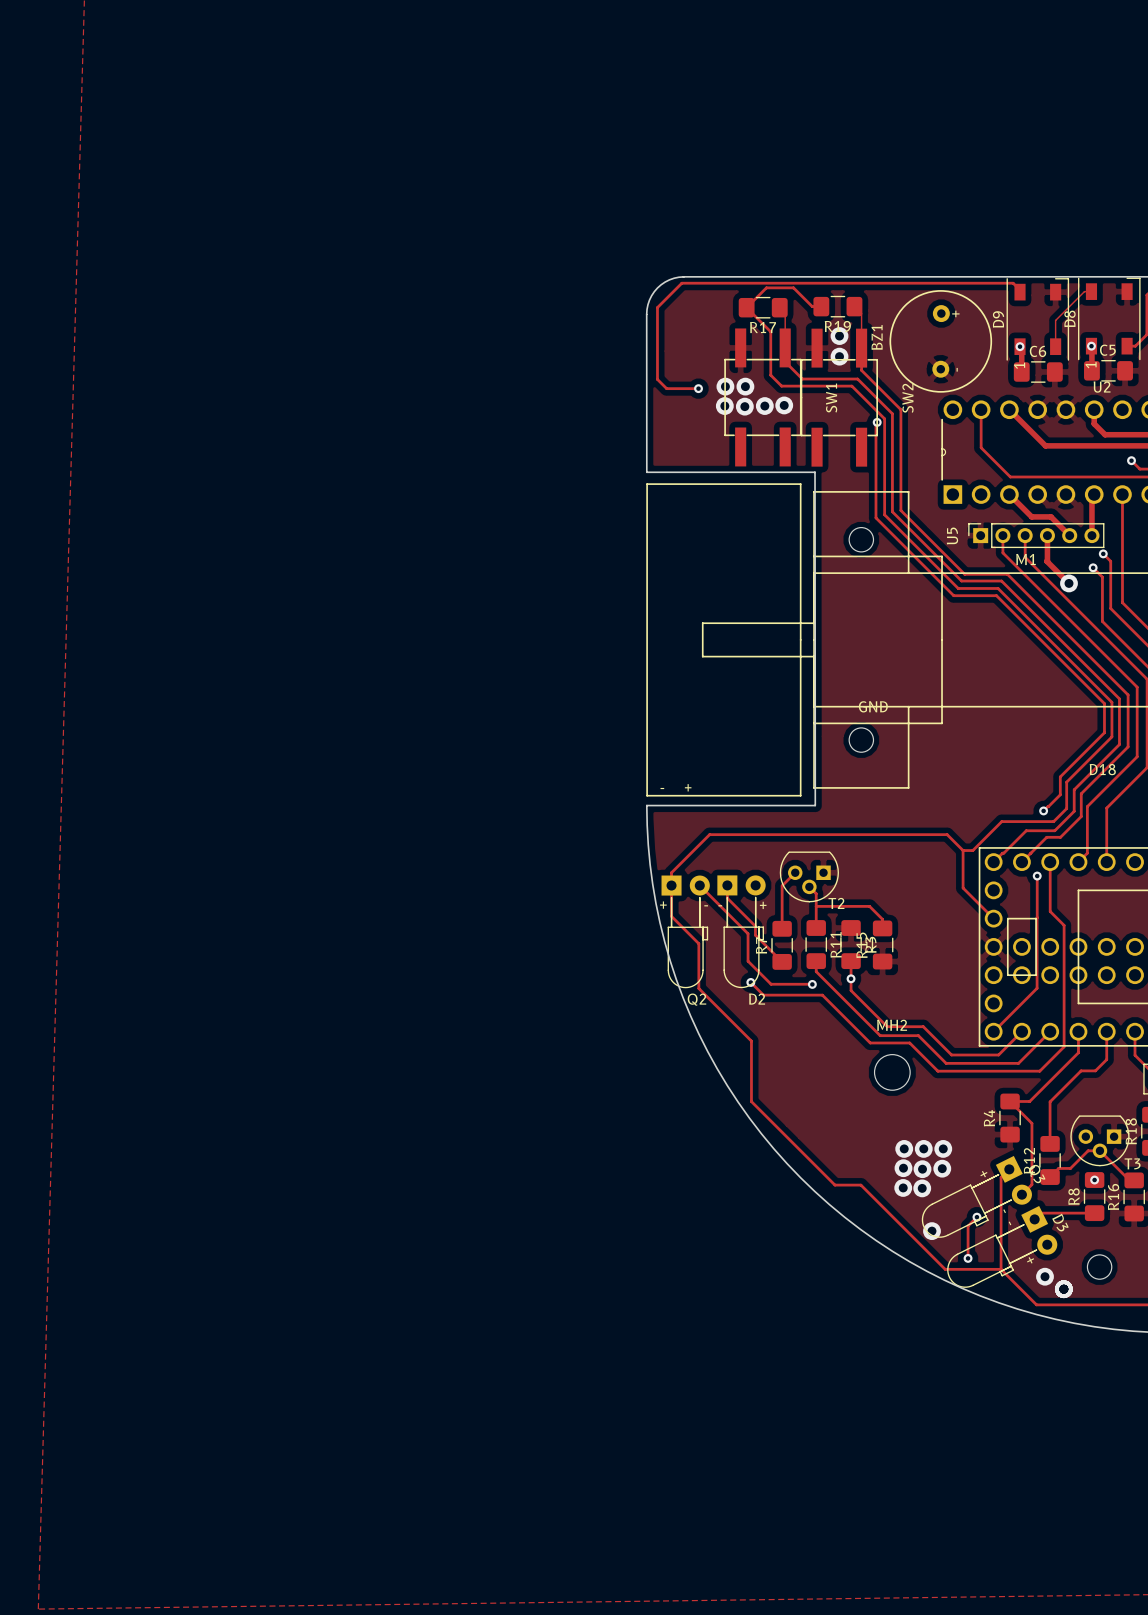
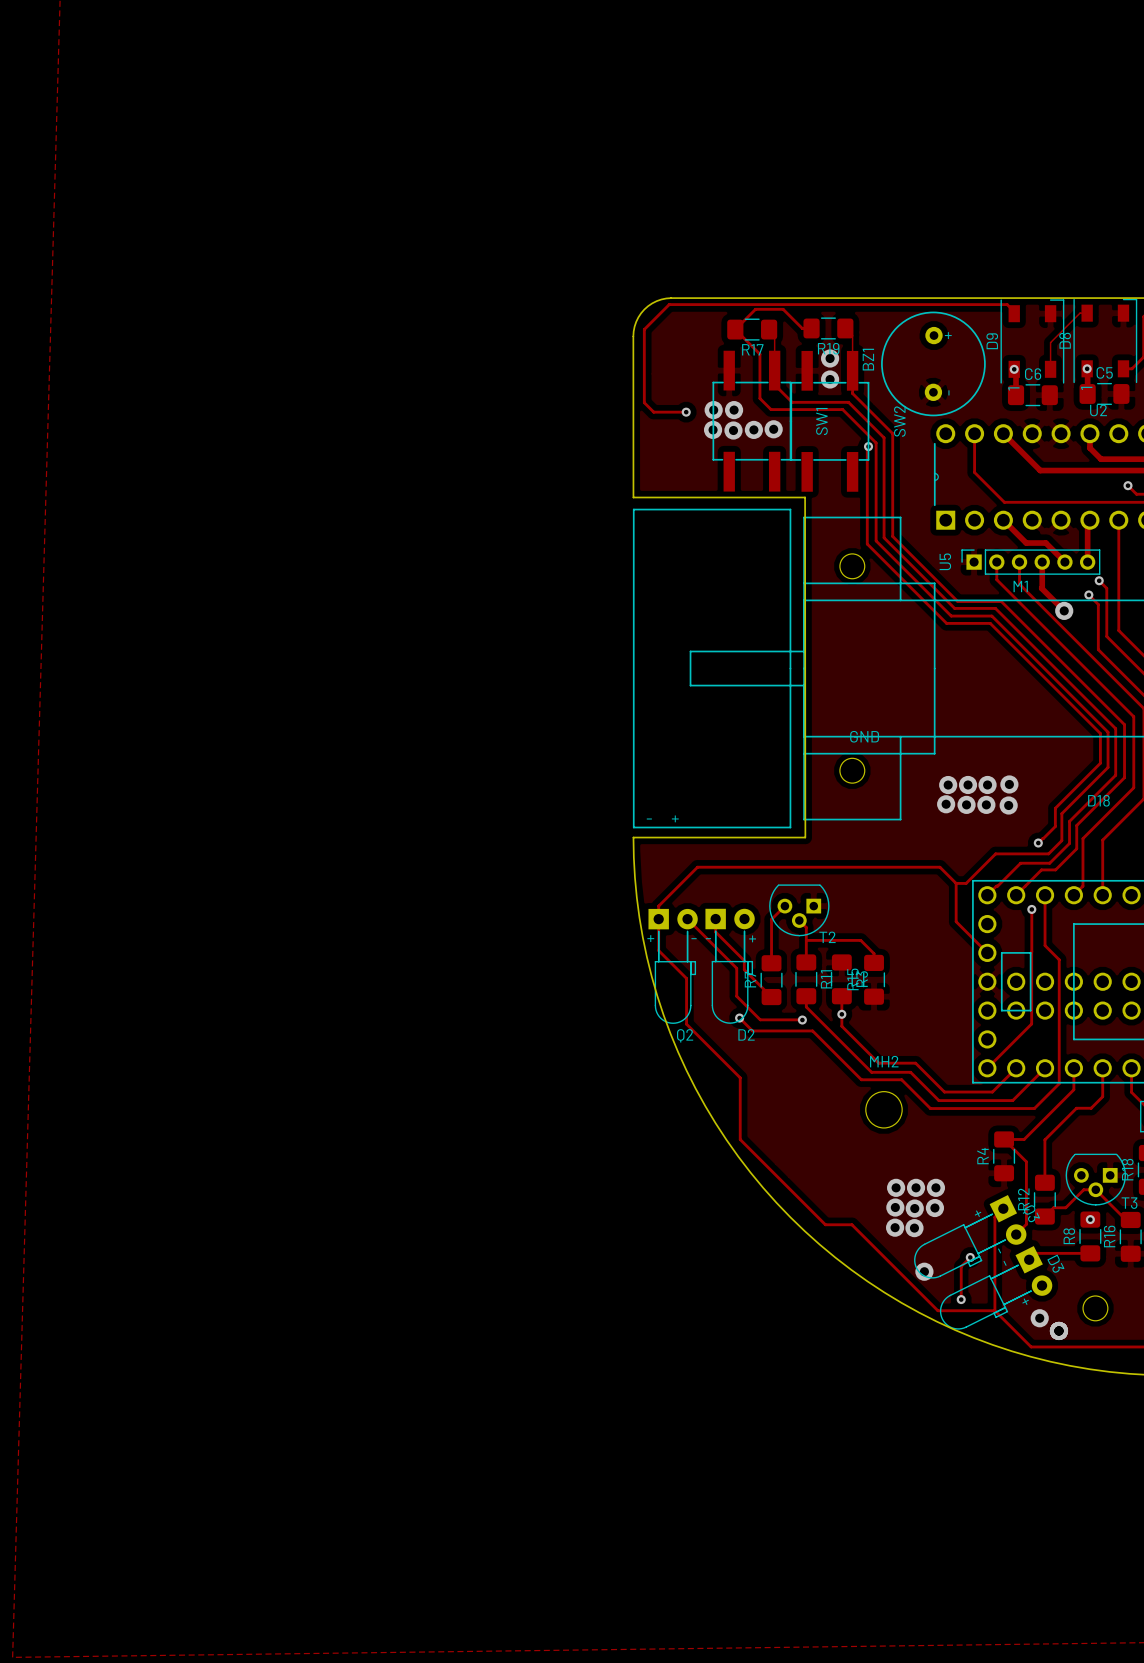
via: none -> (1009, 784)
via: none -> (948, 785)
via: none -> (968, 784)
via: none -> (987, 784)
via: none -> (946, 804)
via: none -> (966, 804)
via: none -> (986, 804)
via: none -> (1008, 805)

